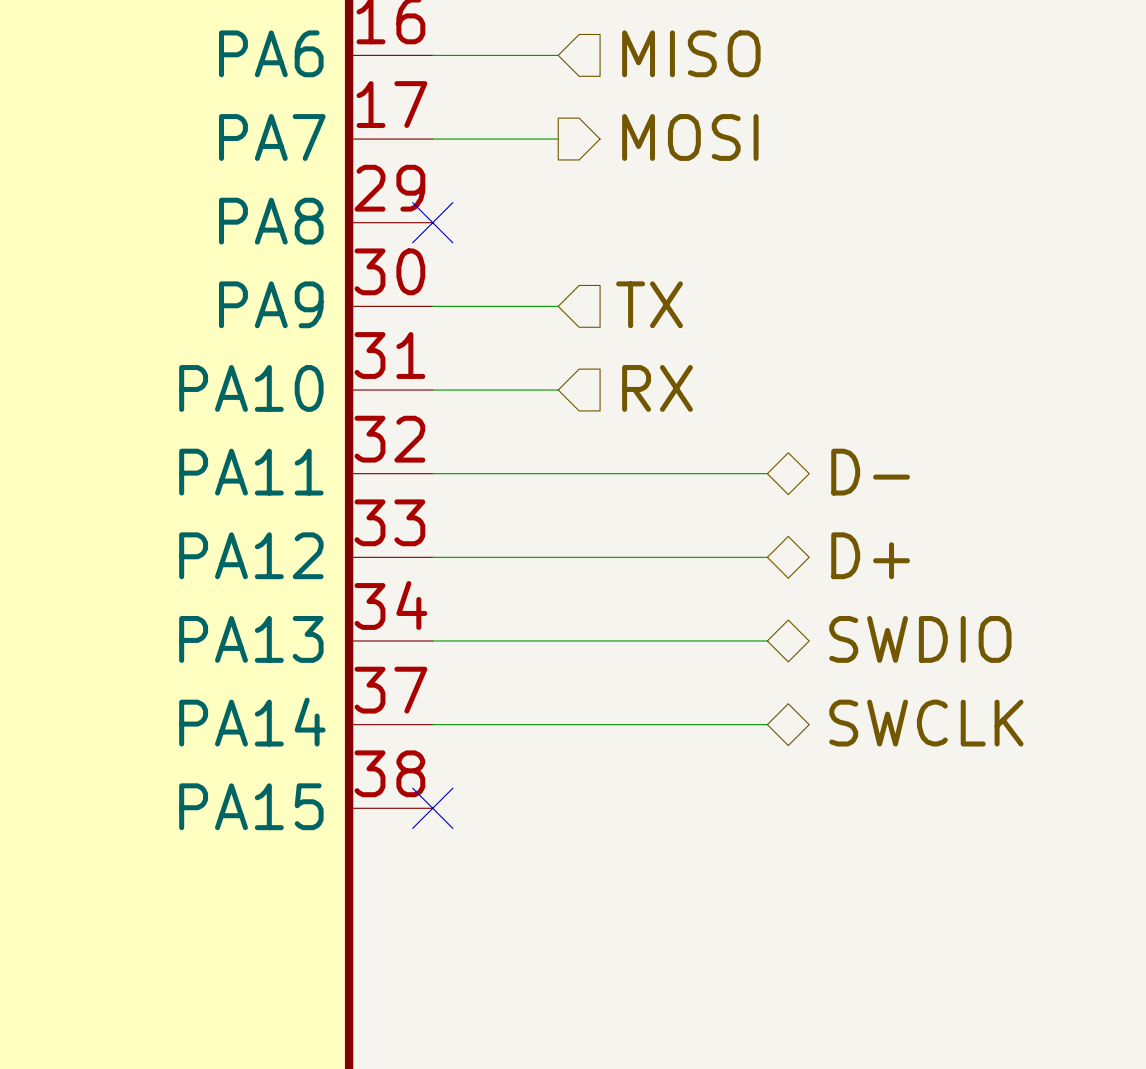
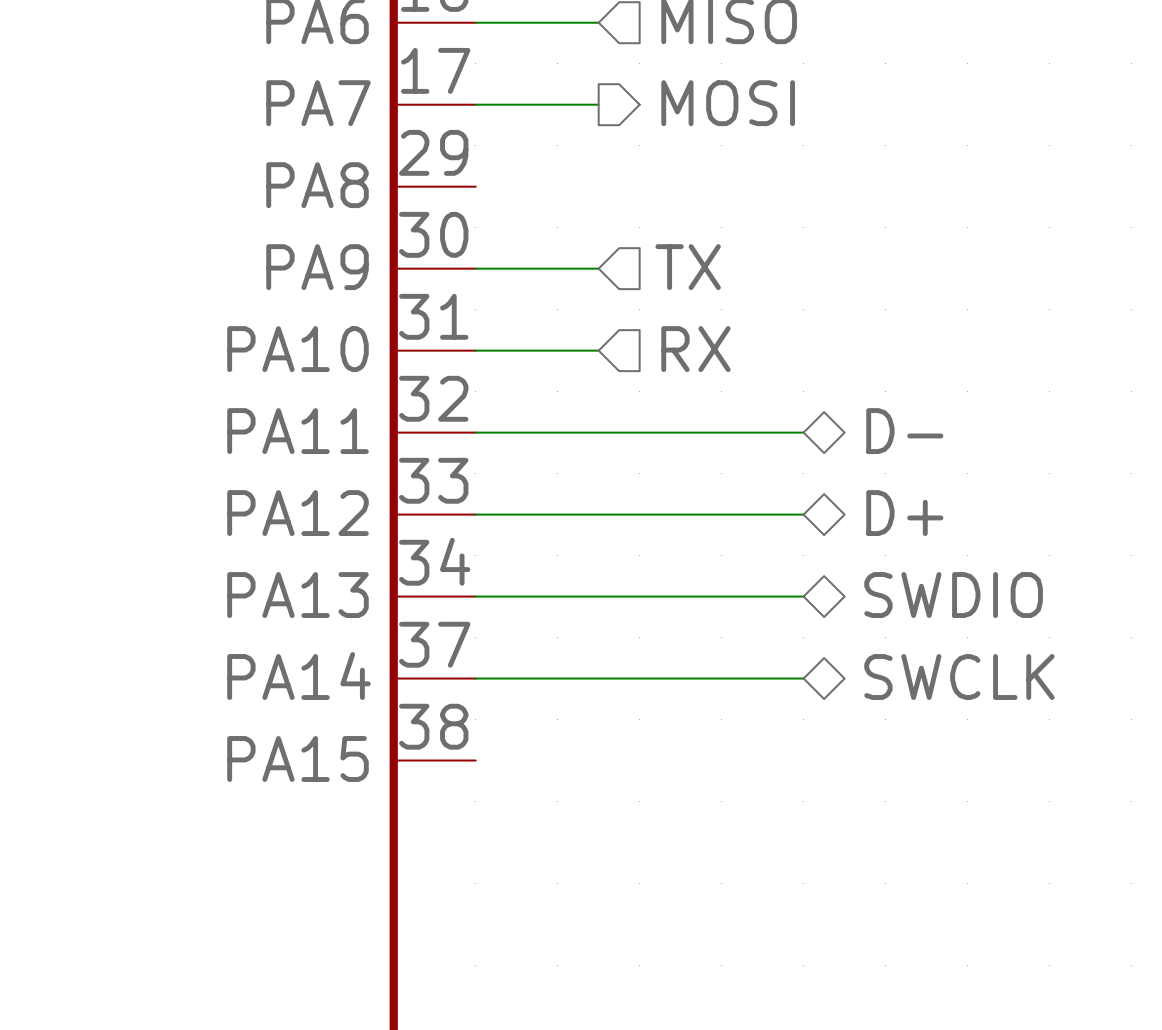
no-connect mark: (432, 222) -> none
no-connect mark: (432, 808) -> none

